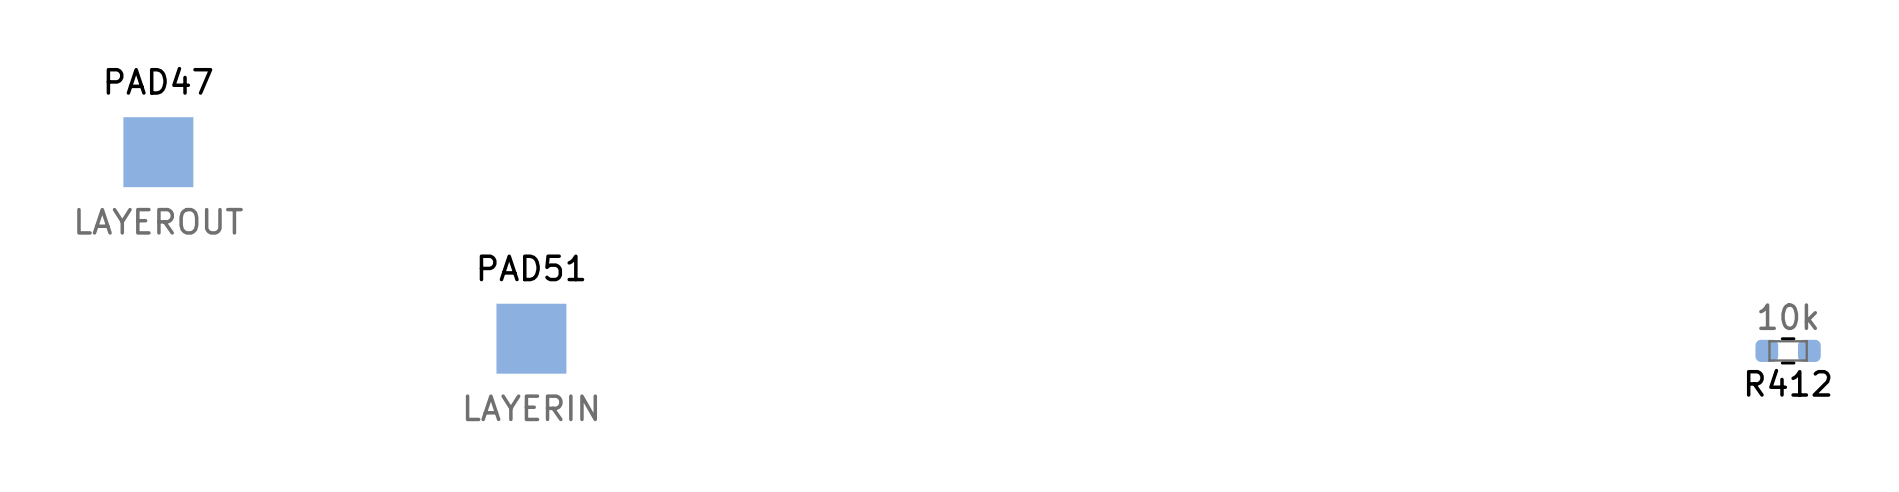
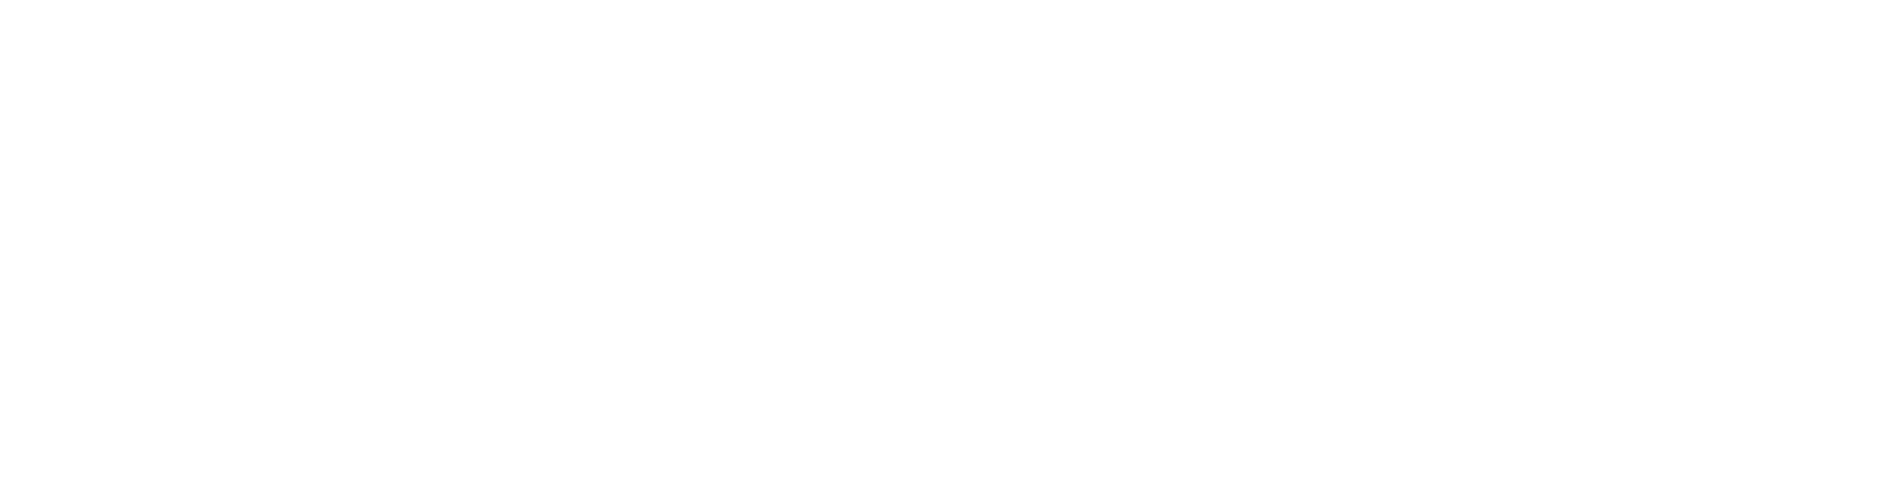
PAD47: LAYEROUT (158, 152) -> none
PAD51: LAYERIN (531, 338) -> none
R412: 10k (1788, 350) -> none

